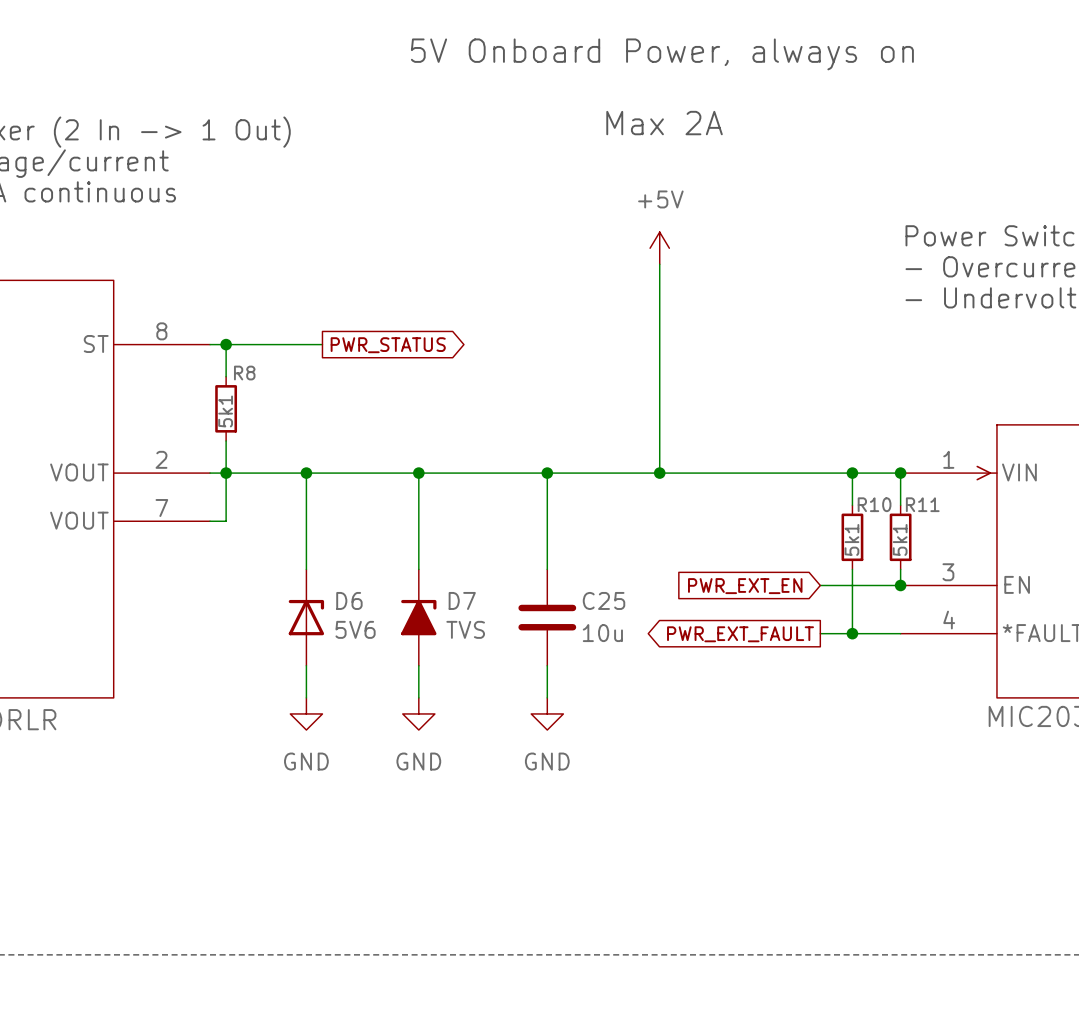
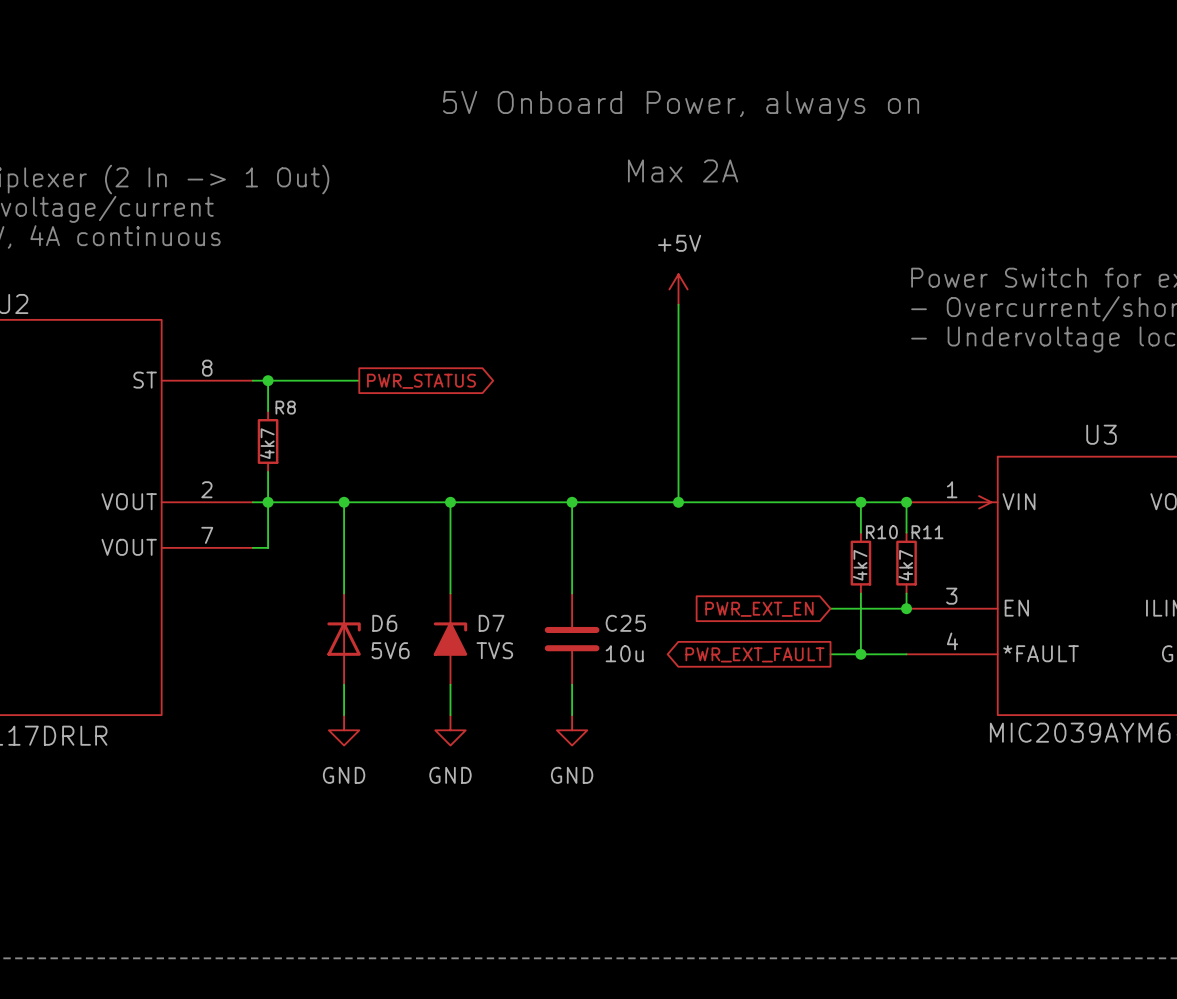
R8 value: 5k1 (225, 411) -> 4k7 (267, 443)
R10 value: 5k1 (851, 539) -> 4k7 (860, 565)
R11 value: 5k1 (900, 539) -> 4k7 (905, 565)

